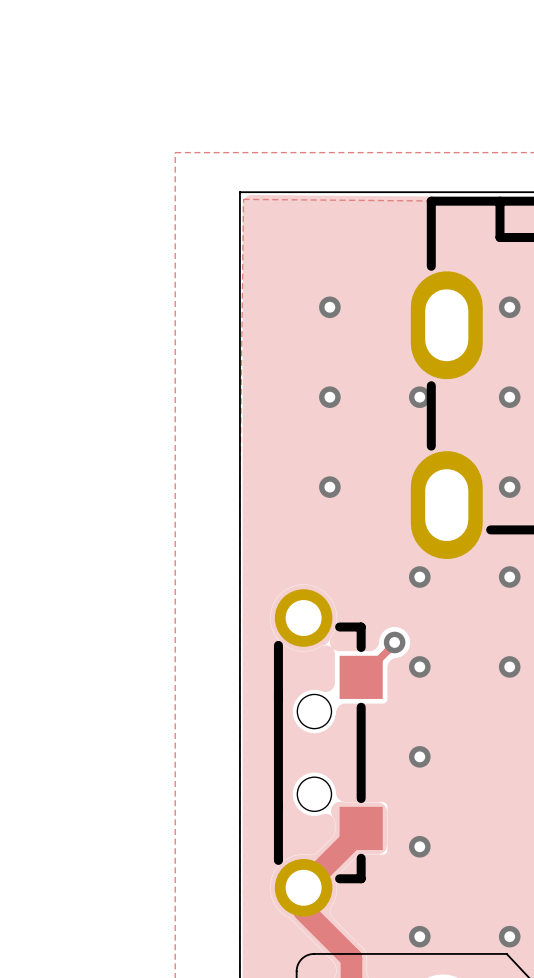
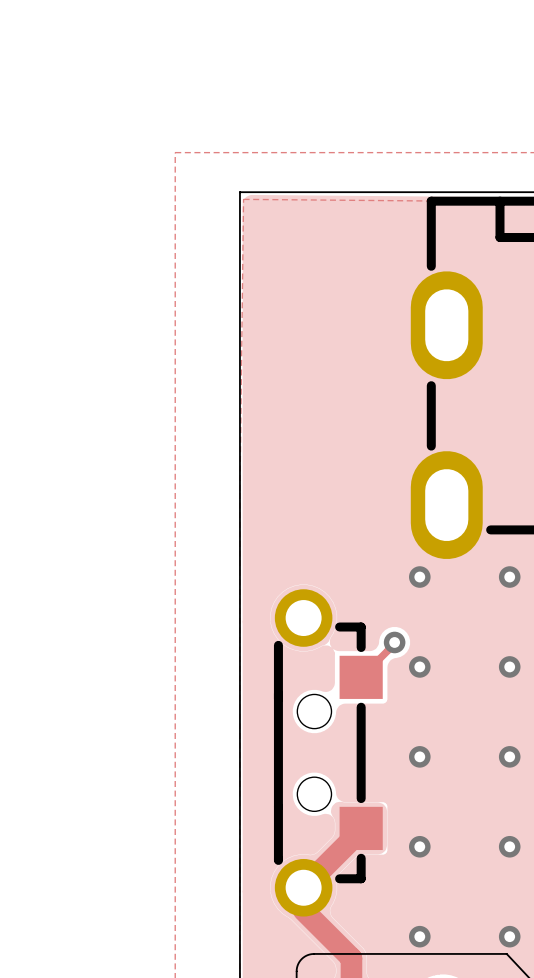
via: (329, 307) -> none
via: (509, 307) -> none
via: (329, 397) -> none
via: (419, 397) -> none
via: (509, 397) -> none
via: (329, 487) -> none
via: (509, 487) -> none
via: none -> (509, 756)
via: none -> (509, 846)

